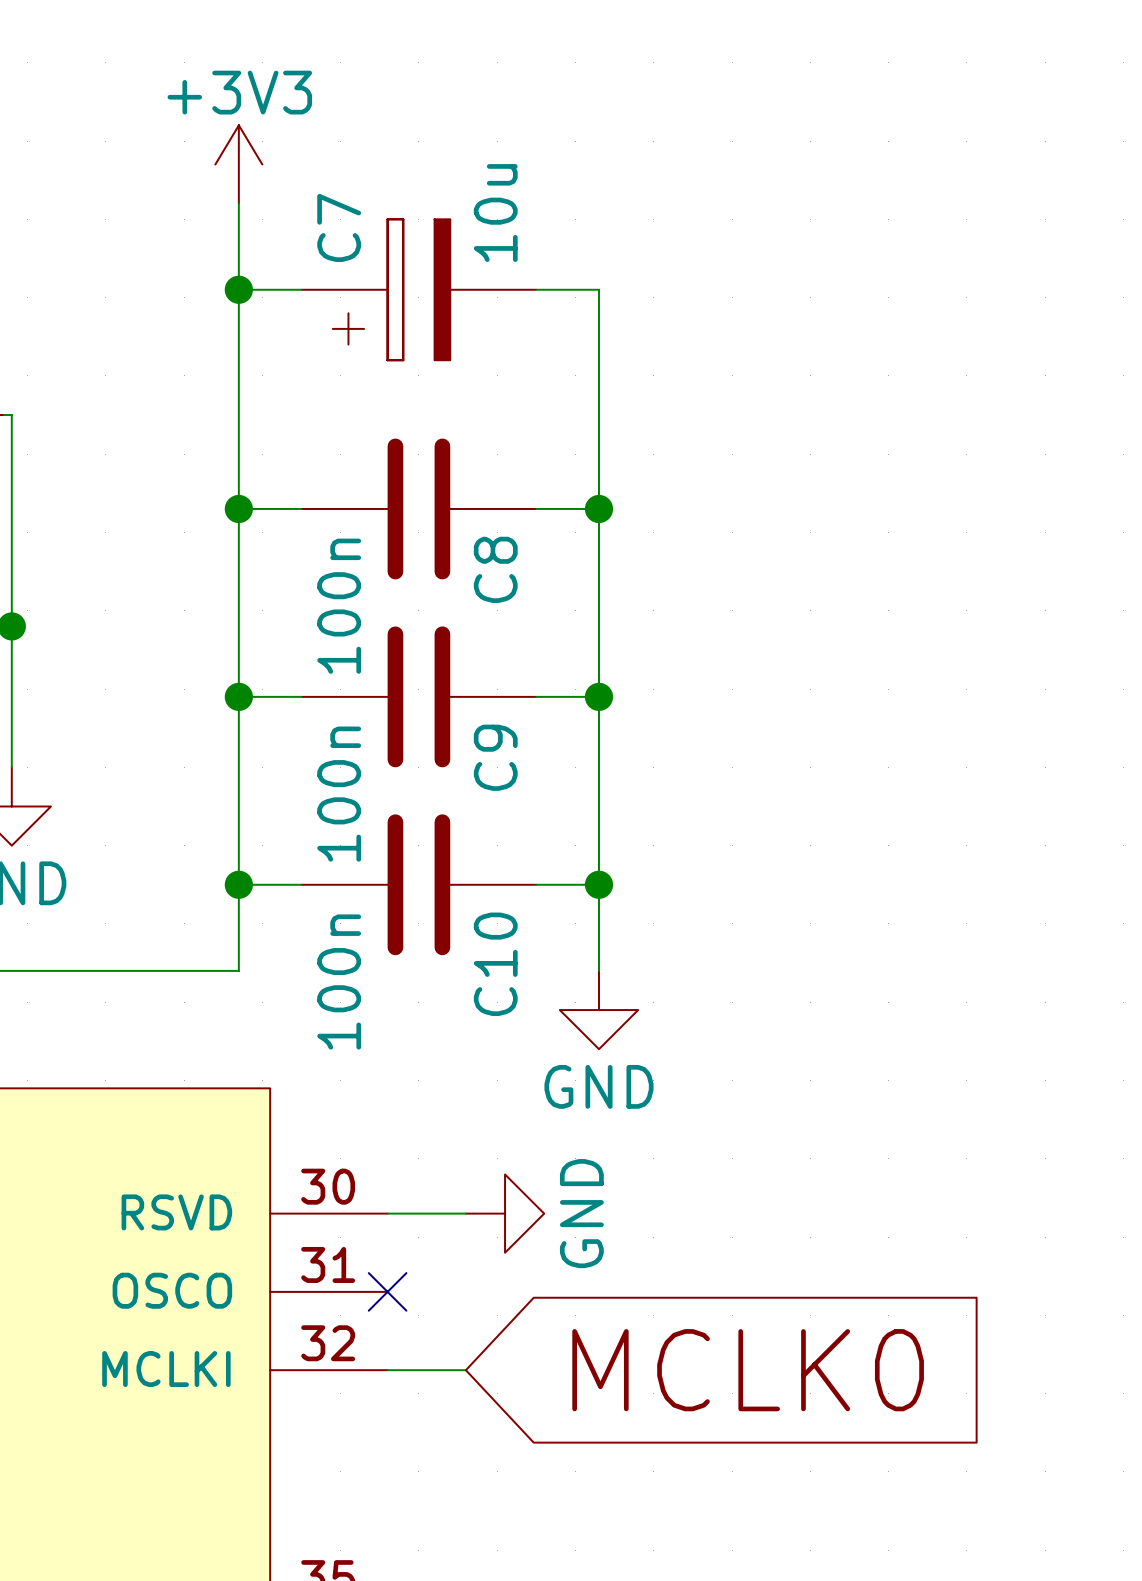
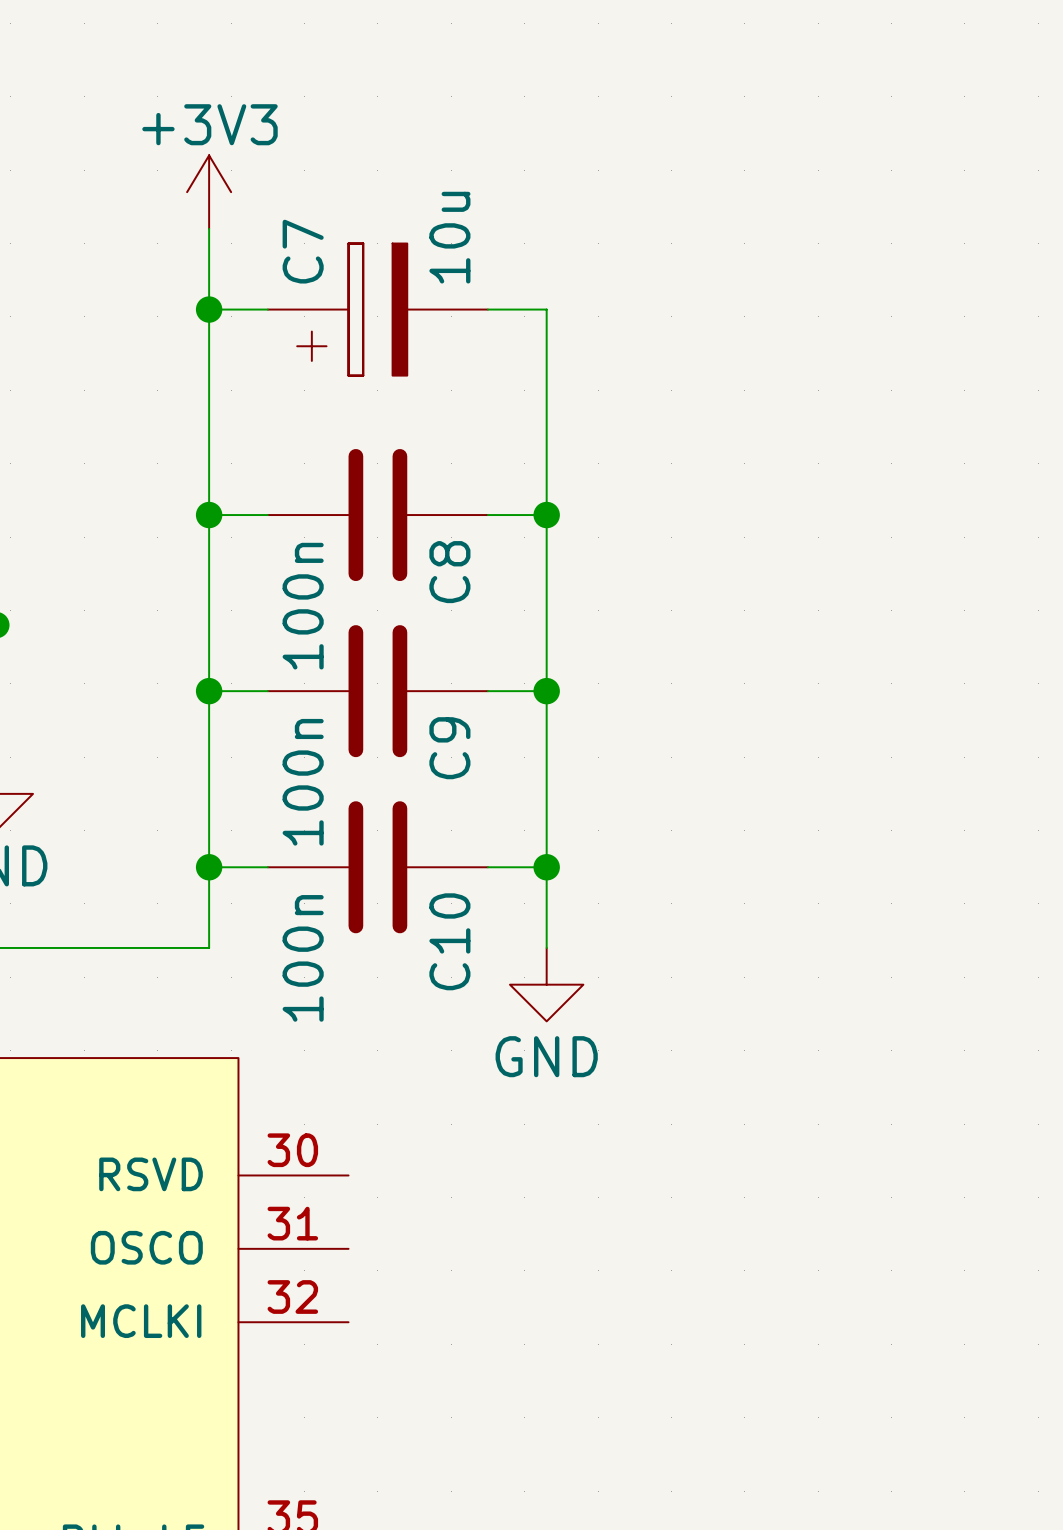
wire: (387, 1213) (465, 1213) -> none
power symbol: GND (505, 1213) -> none
no-connect mark: (387, 1291) -> none
wire: (387, 1370) (465, 1370) -> none
global label: MCLK0 (748, 1370) -> none

